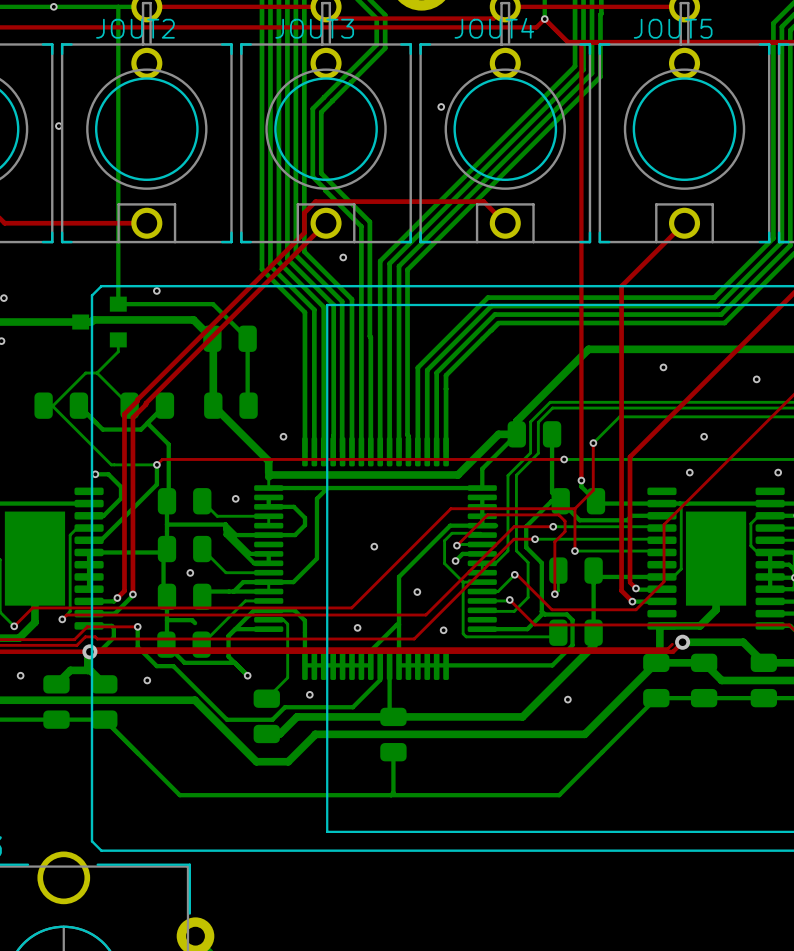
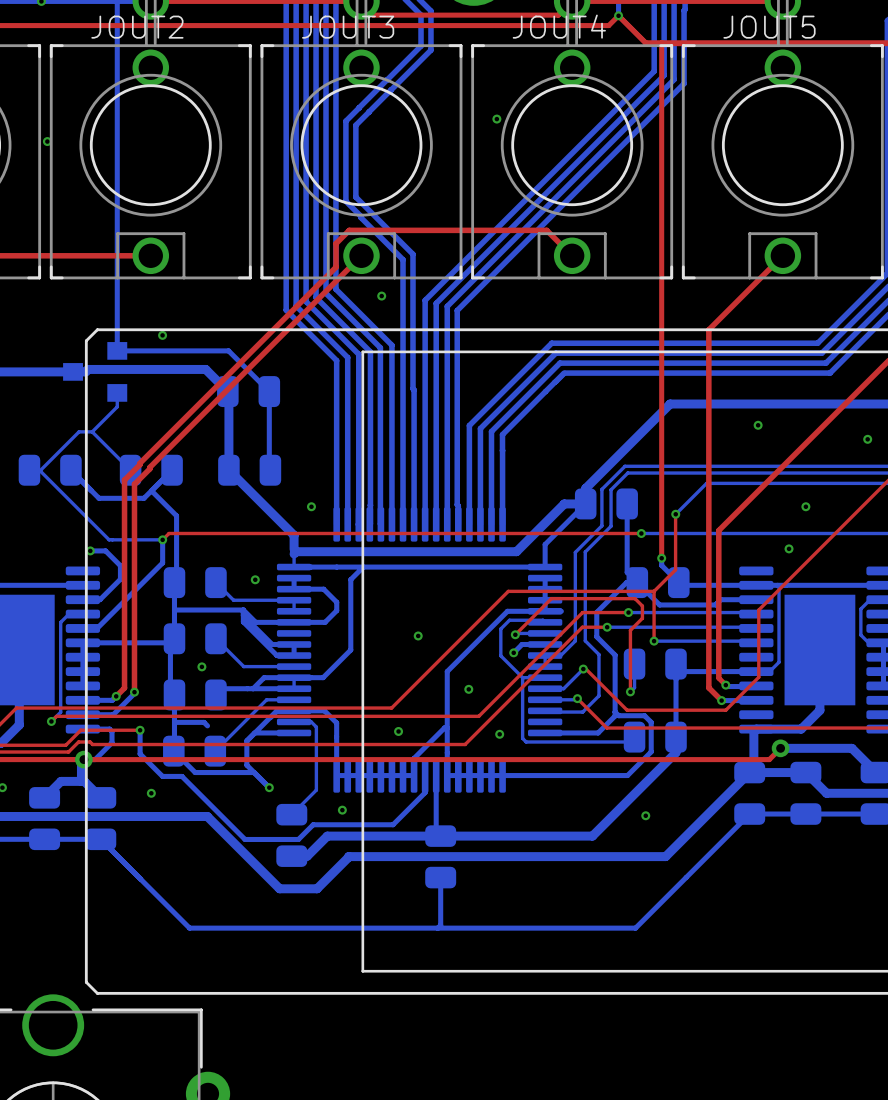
top track: (672, 644) (668, 648) (90, 648) -> none

